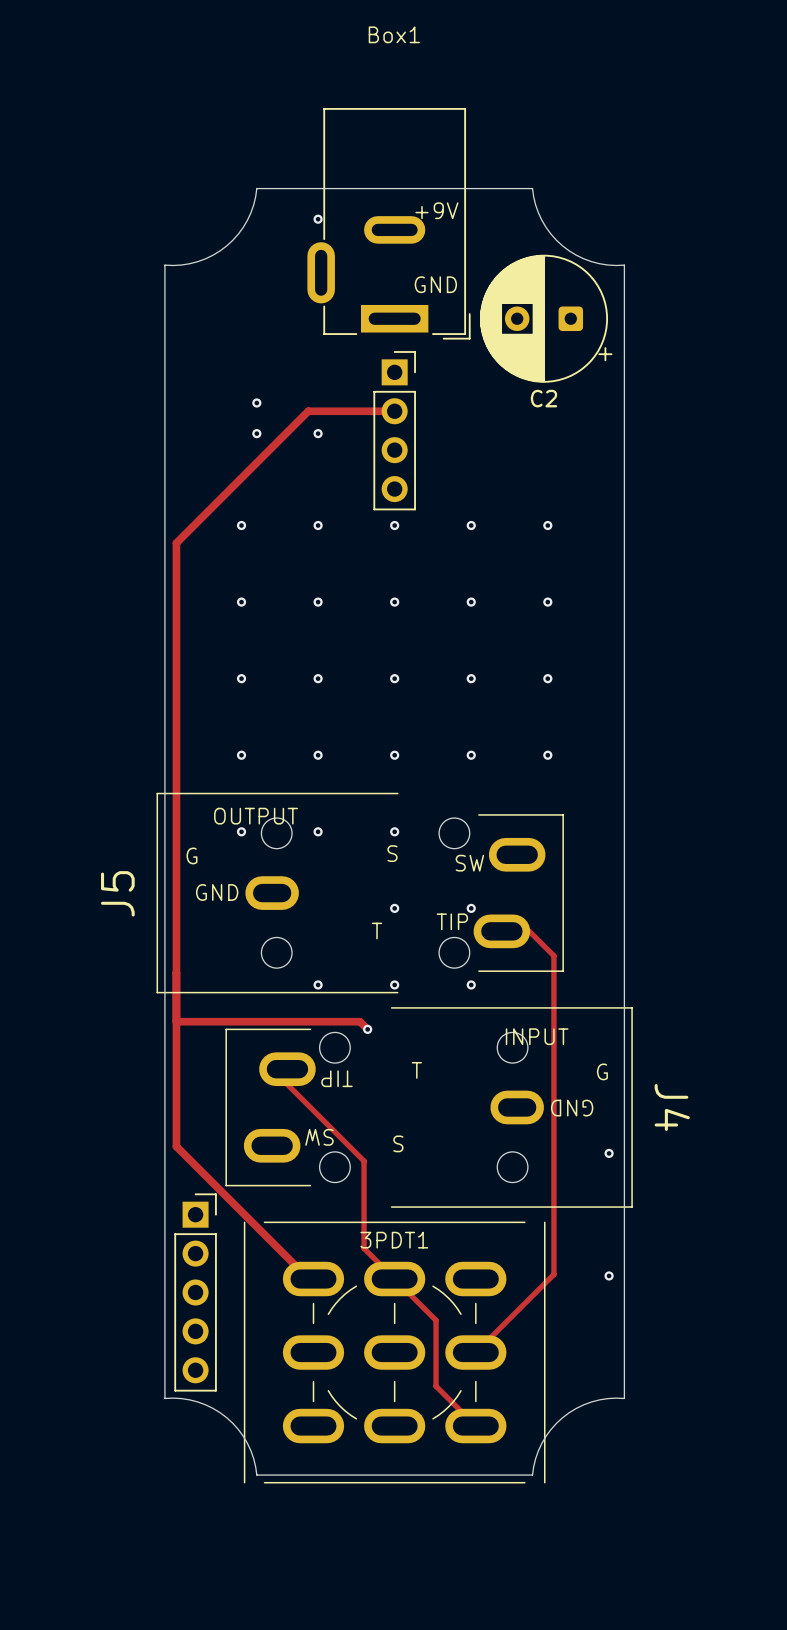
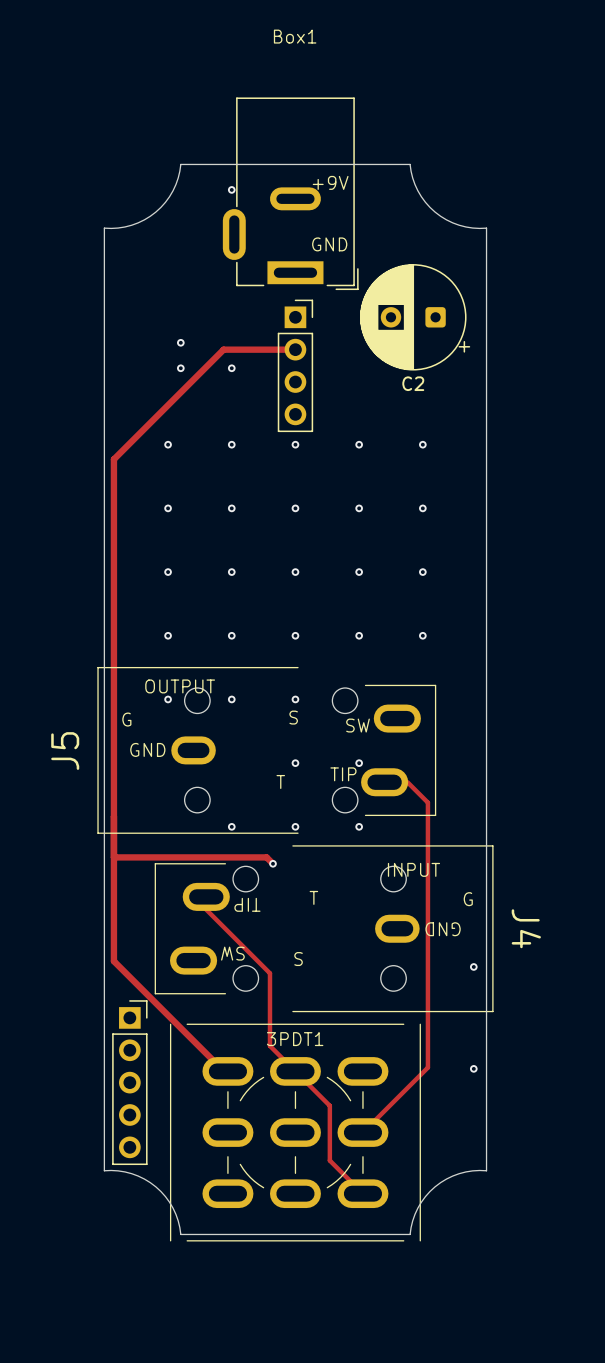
C2 position: (546, 318) -> (415, 317)

